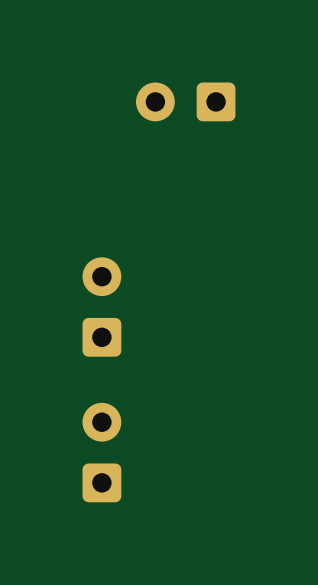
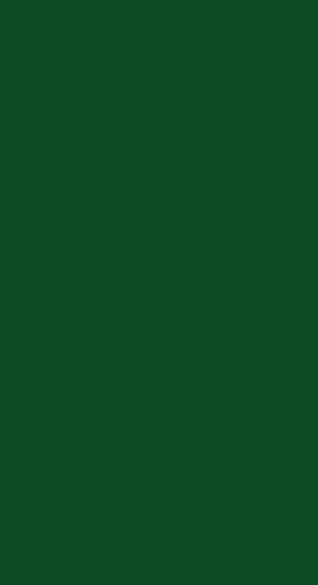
part: (185, 101) -> none
part: (101, 307) -> none
part: (101, 452) -> none

